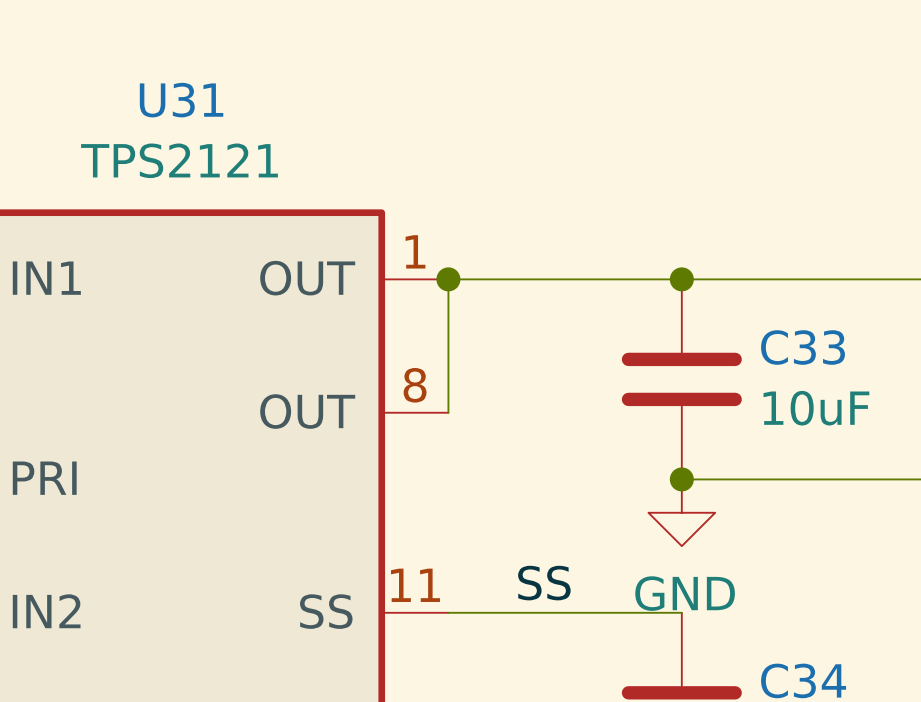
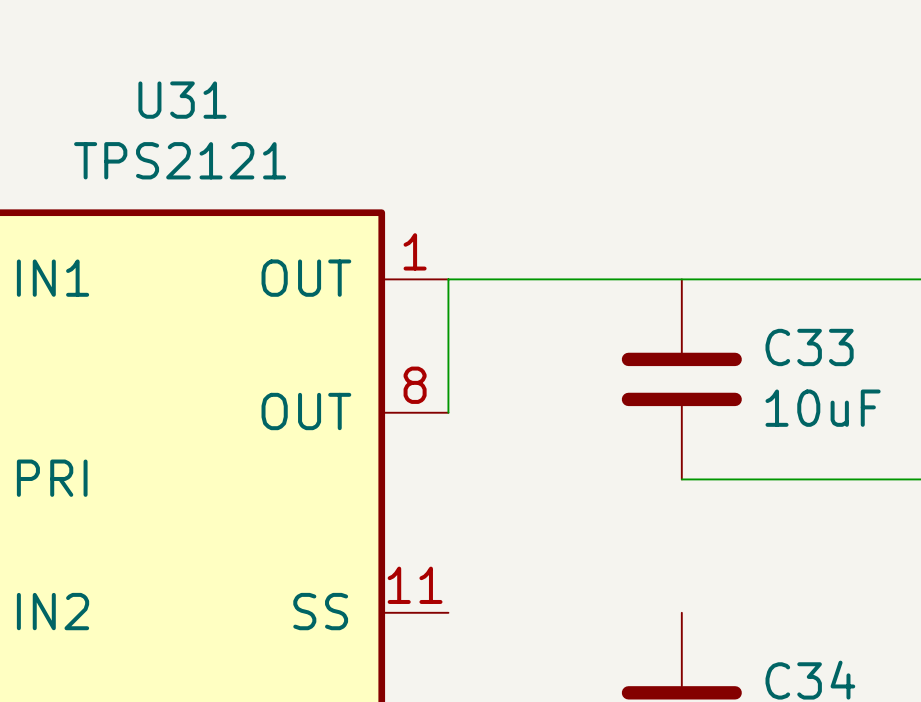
junction: (448, 279) -> none
junction: (681, 279) -> none
junction: (681, 479) -> none
power symbol: GND (681, 512) -> none
label: SS (544, 583) -> none
wire: (448, 612) (681, 612) -> none

